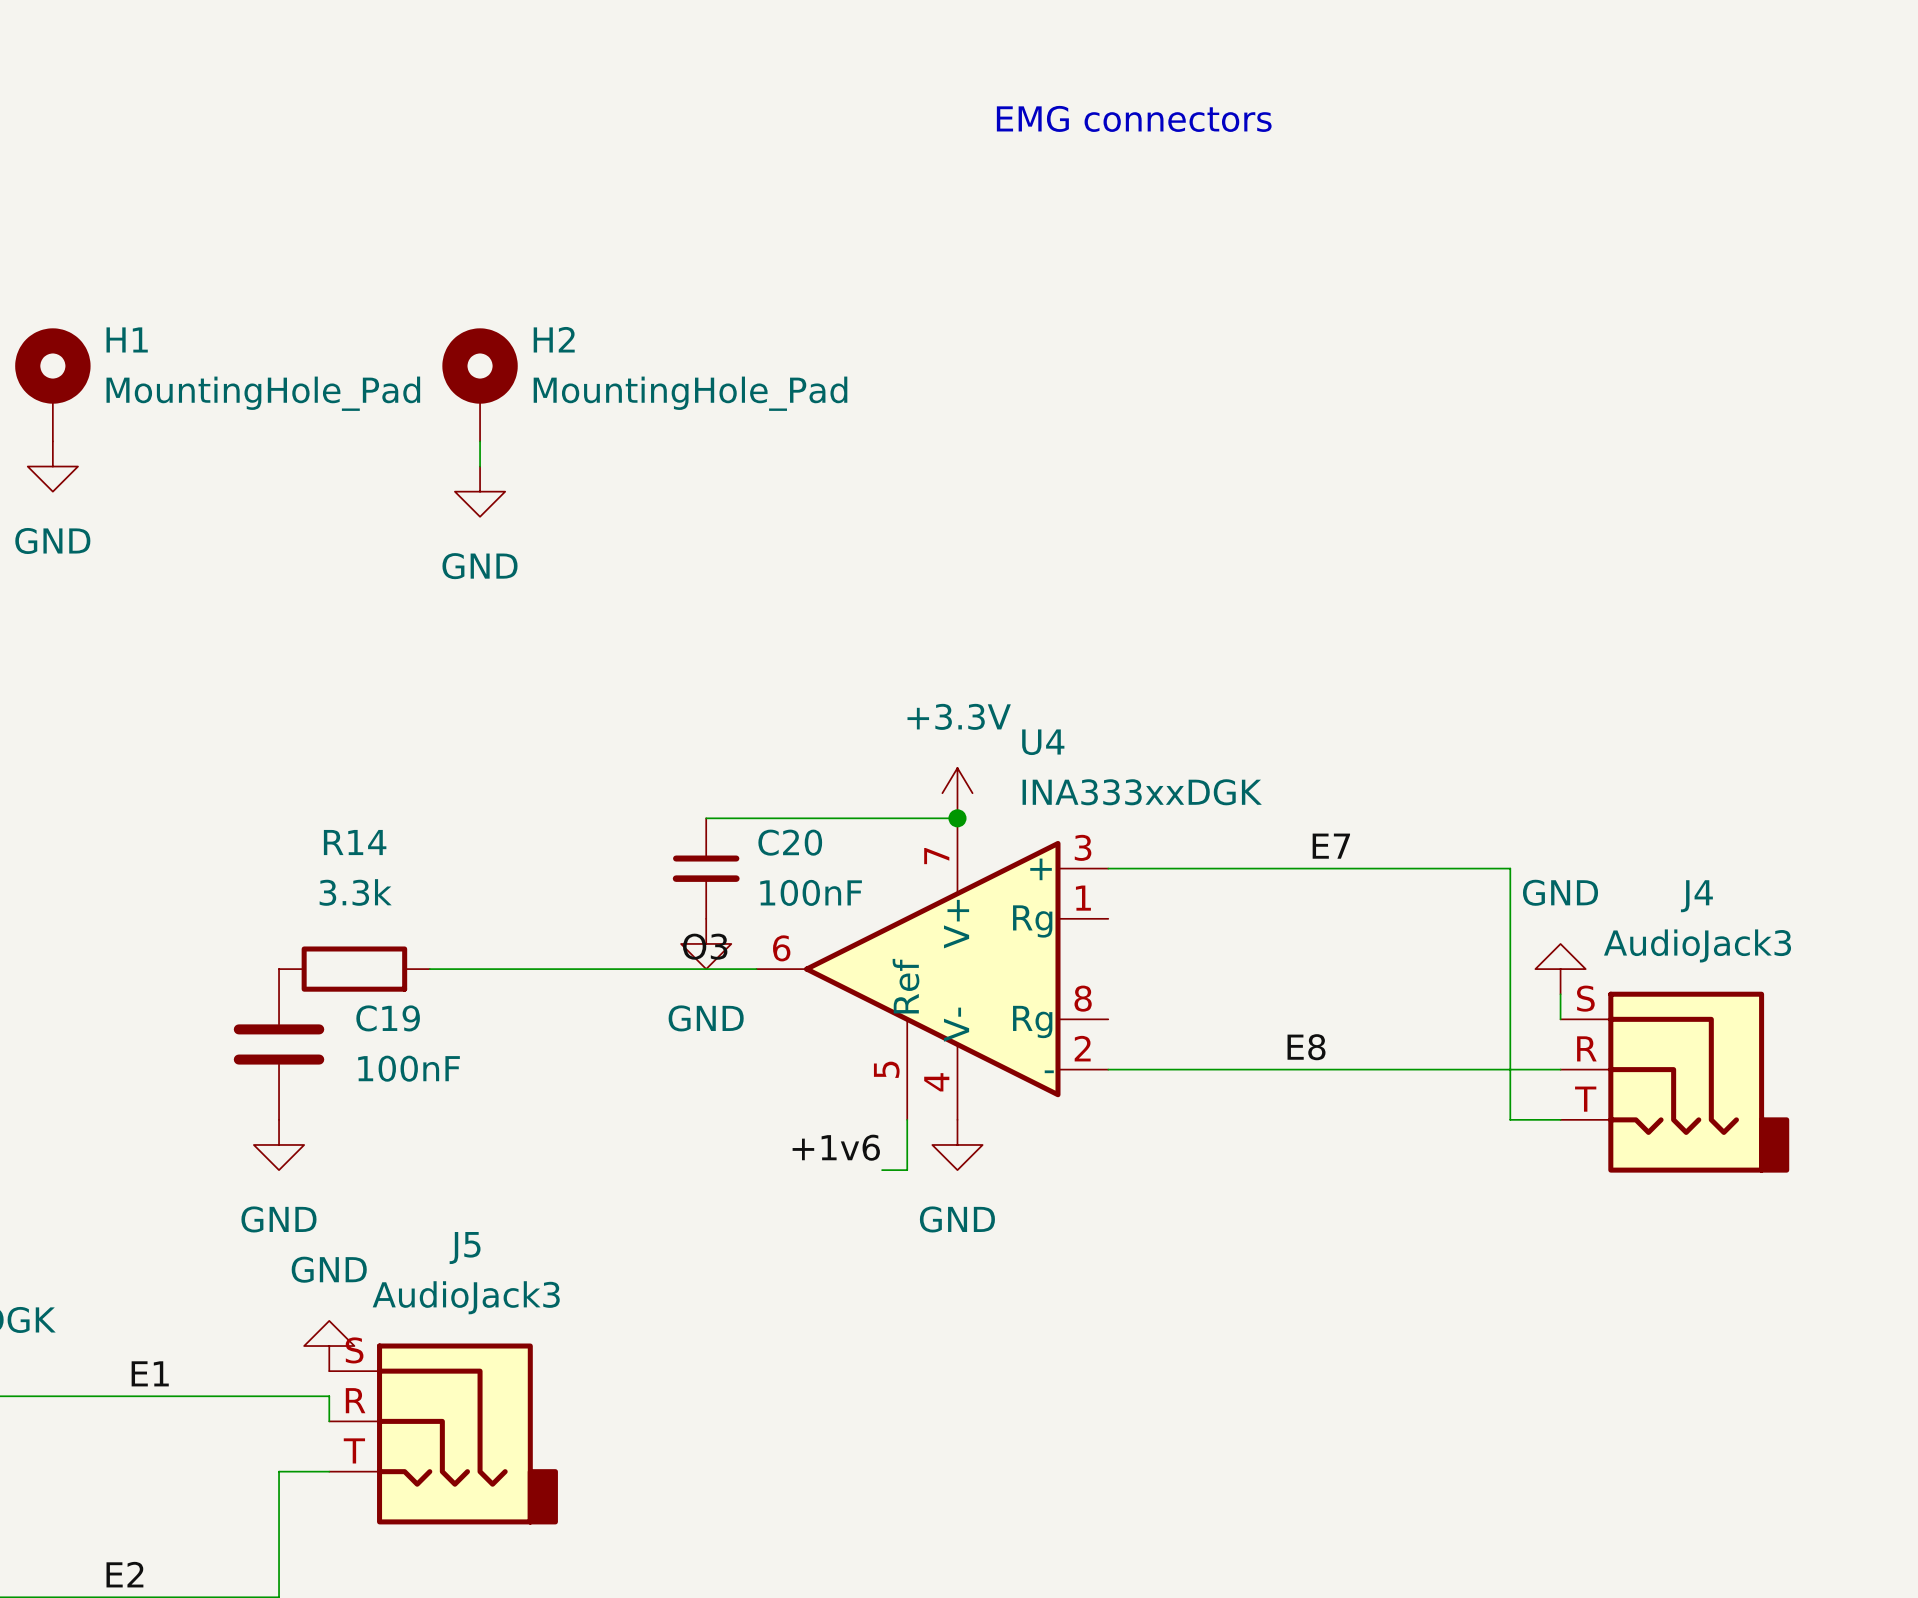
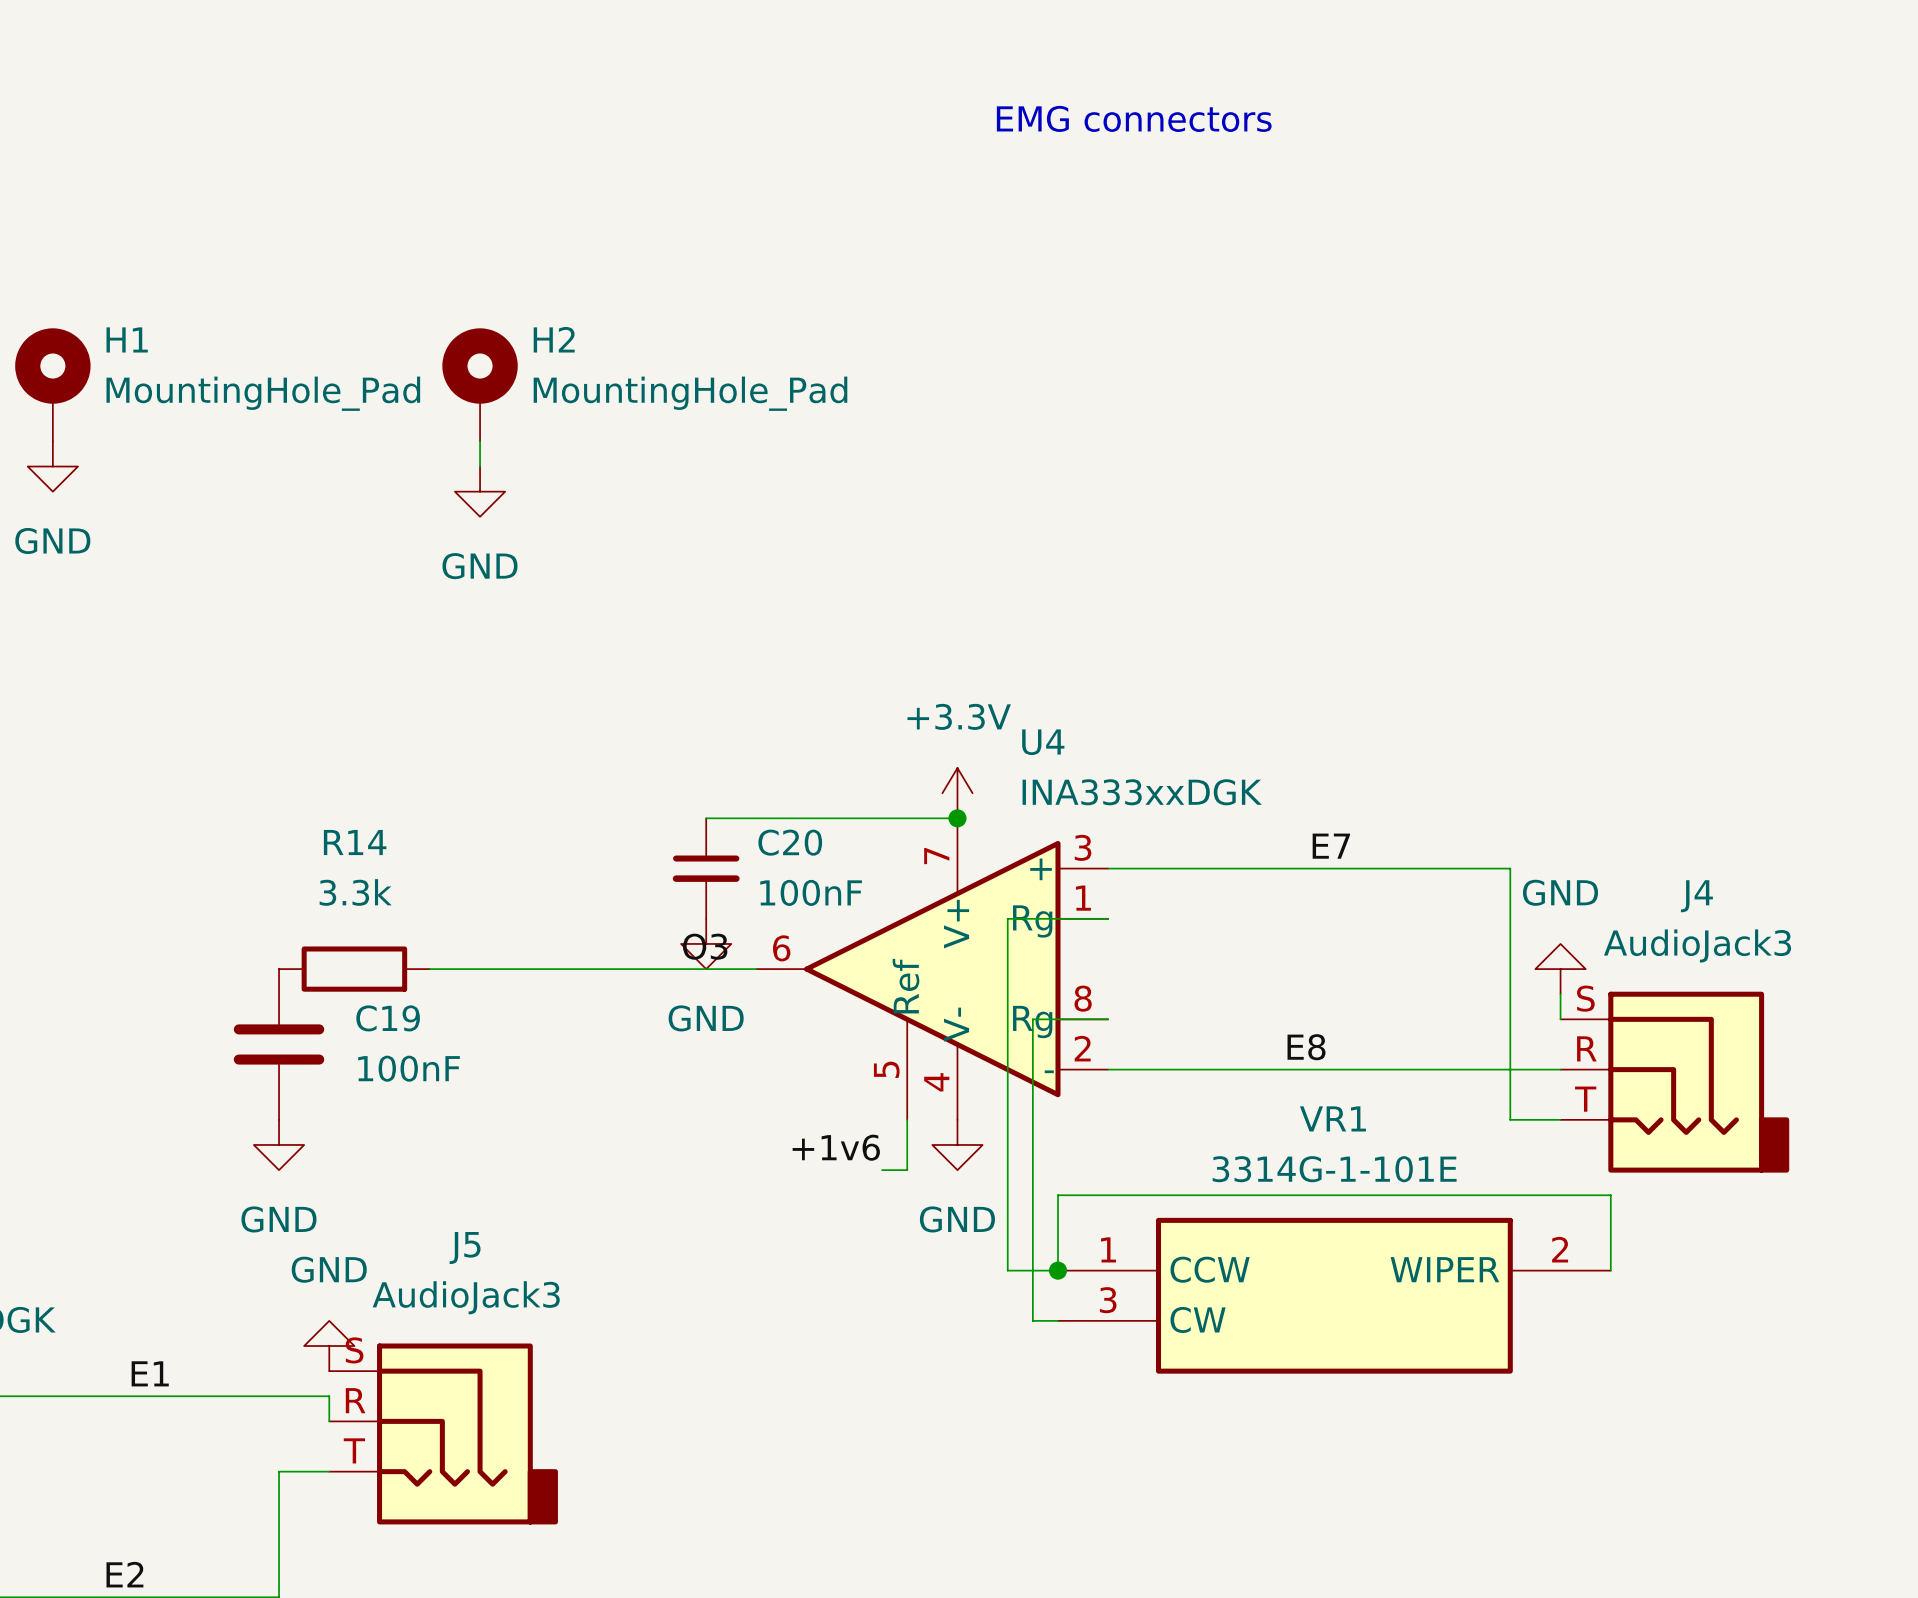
wire: none -> (1108, 918) (1007, 918) (1007, 1270) (1057, 1270) (1057, 1195) (1610, 1195) (1610, 1270)
wire: none -> (1108, 1019) (1032, 1019) (1032, 1320) (1057, 1320)
junction: none -> (1057, 1270)
VR1: none -> 3314G-1-101E (1334, 1295)

